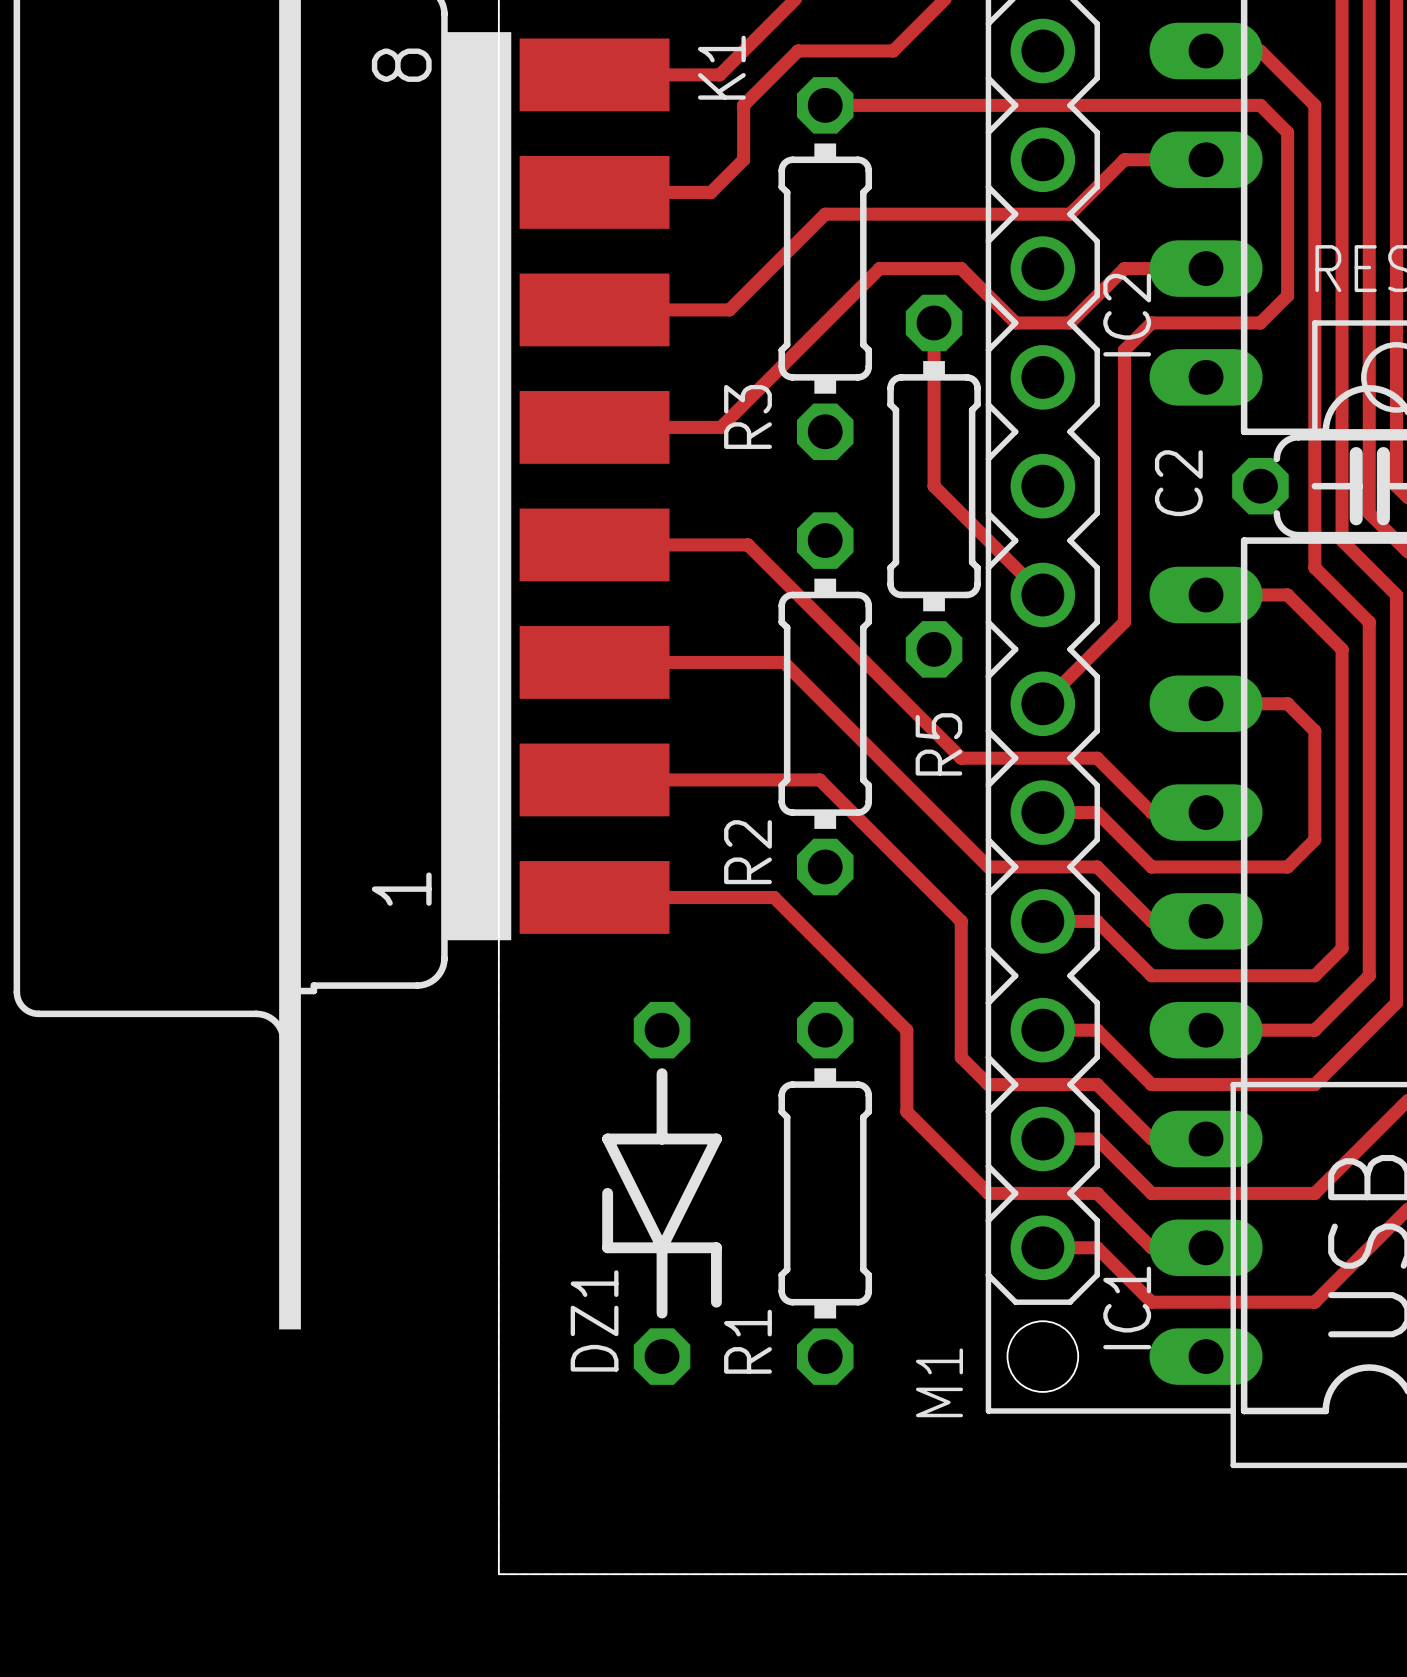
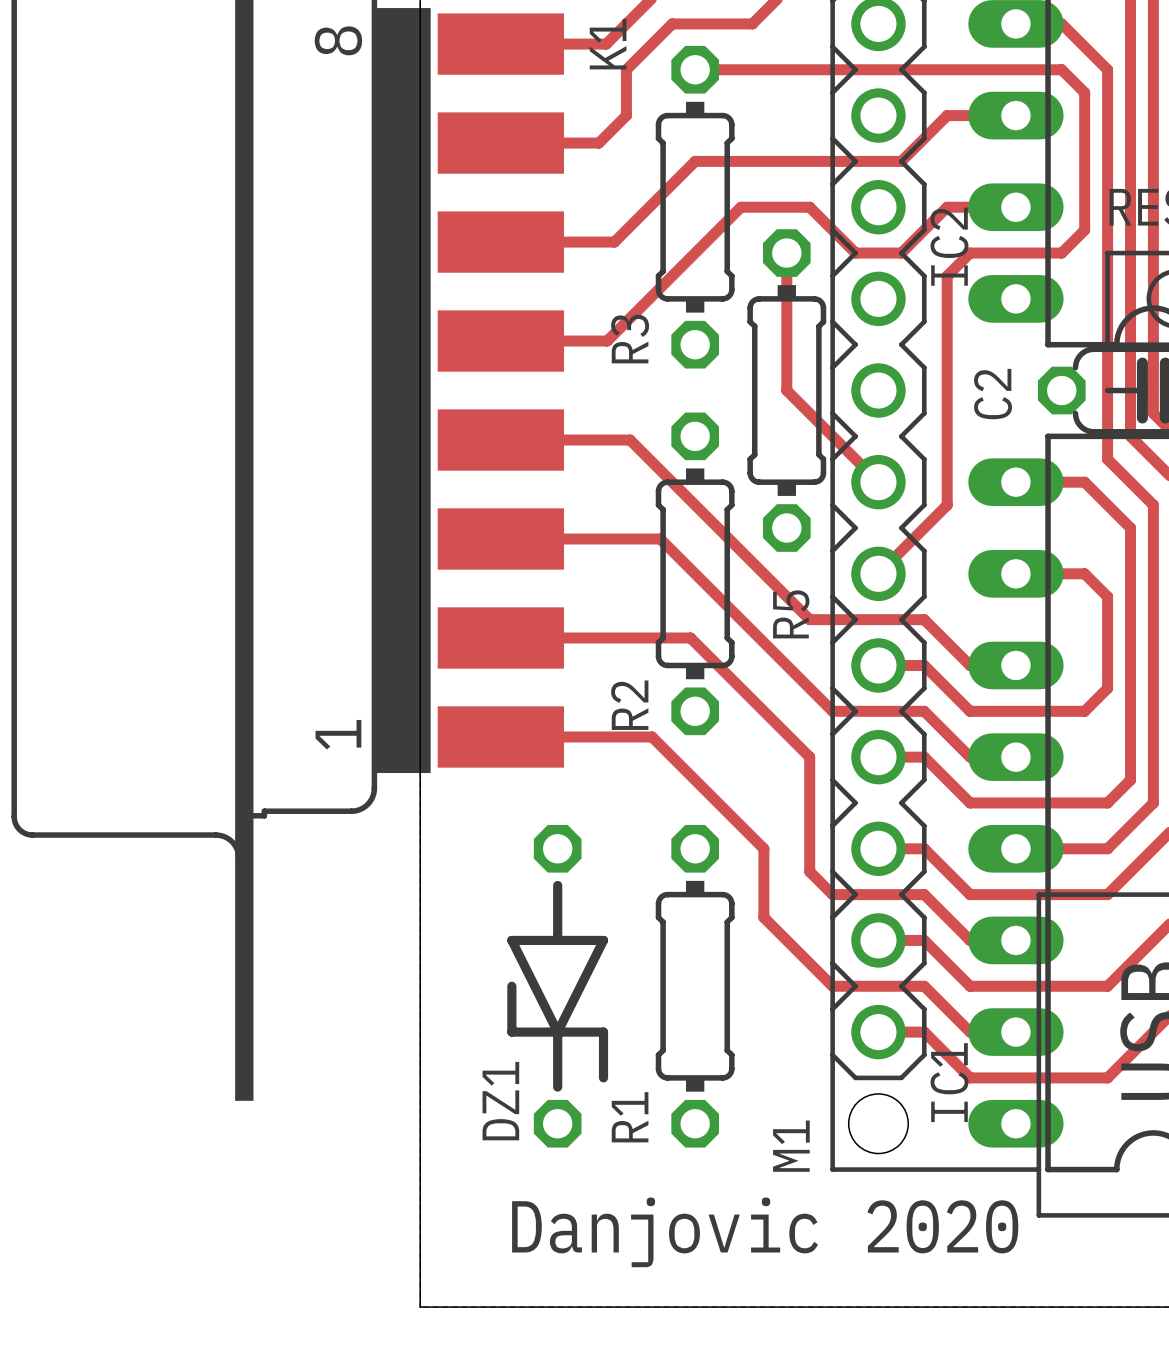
text: none -> Danjovic 2020 (765, 1232)

